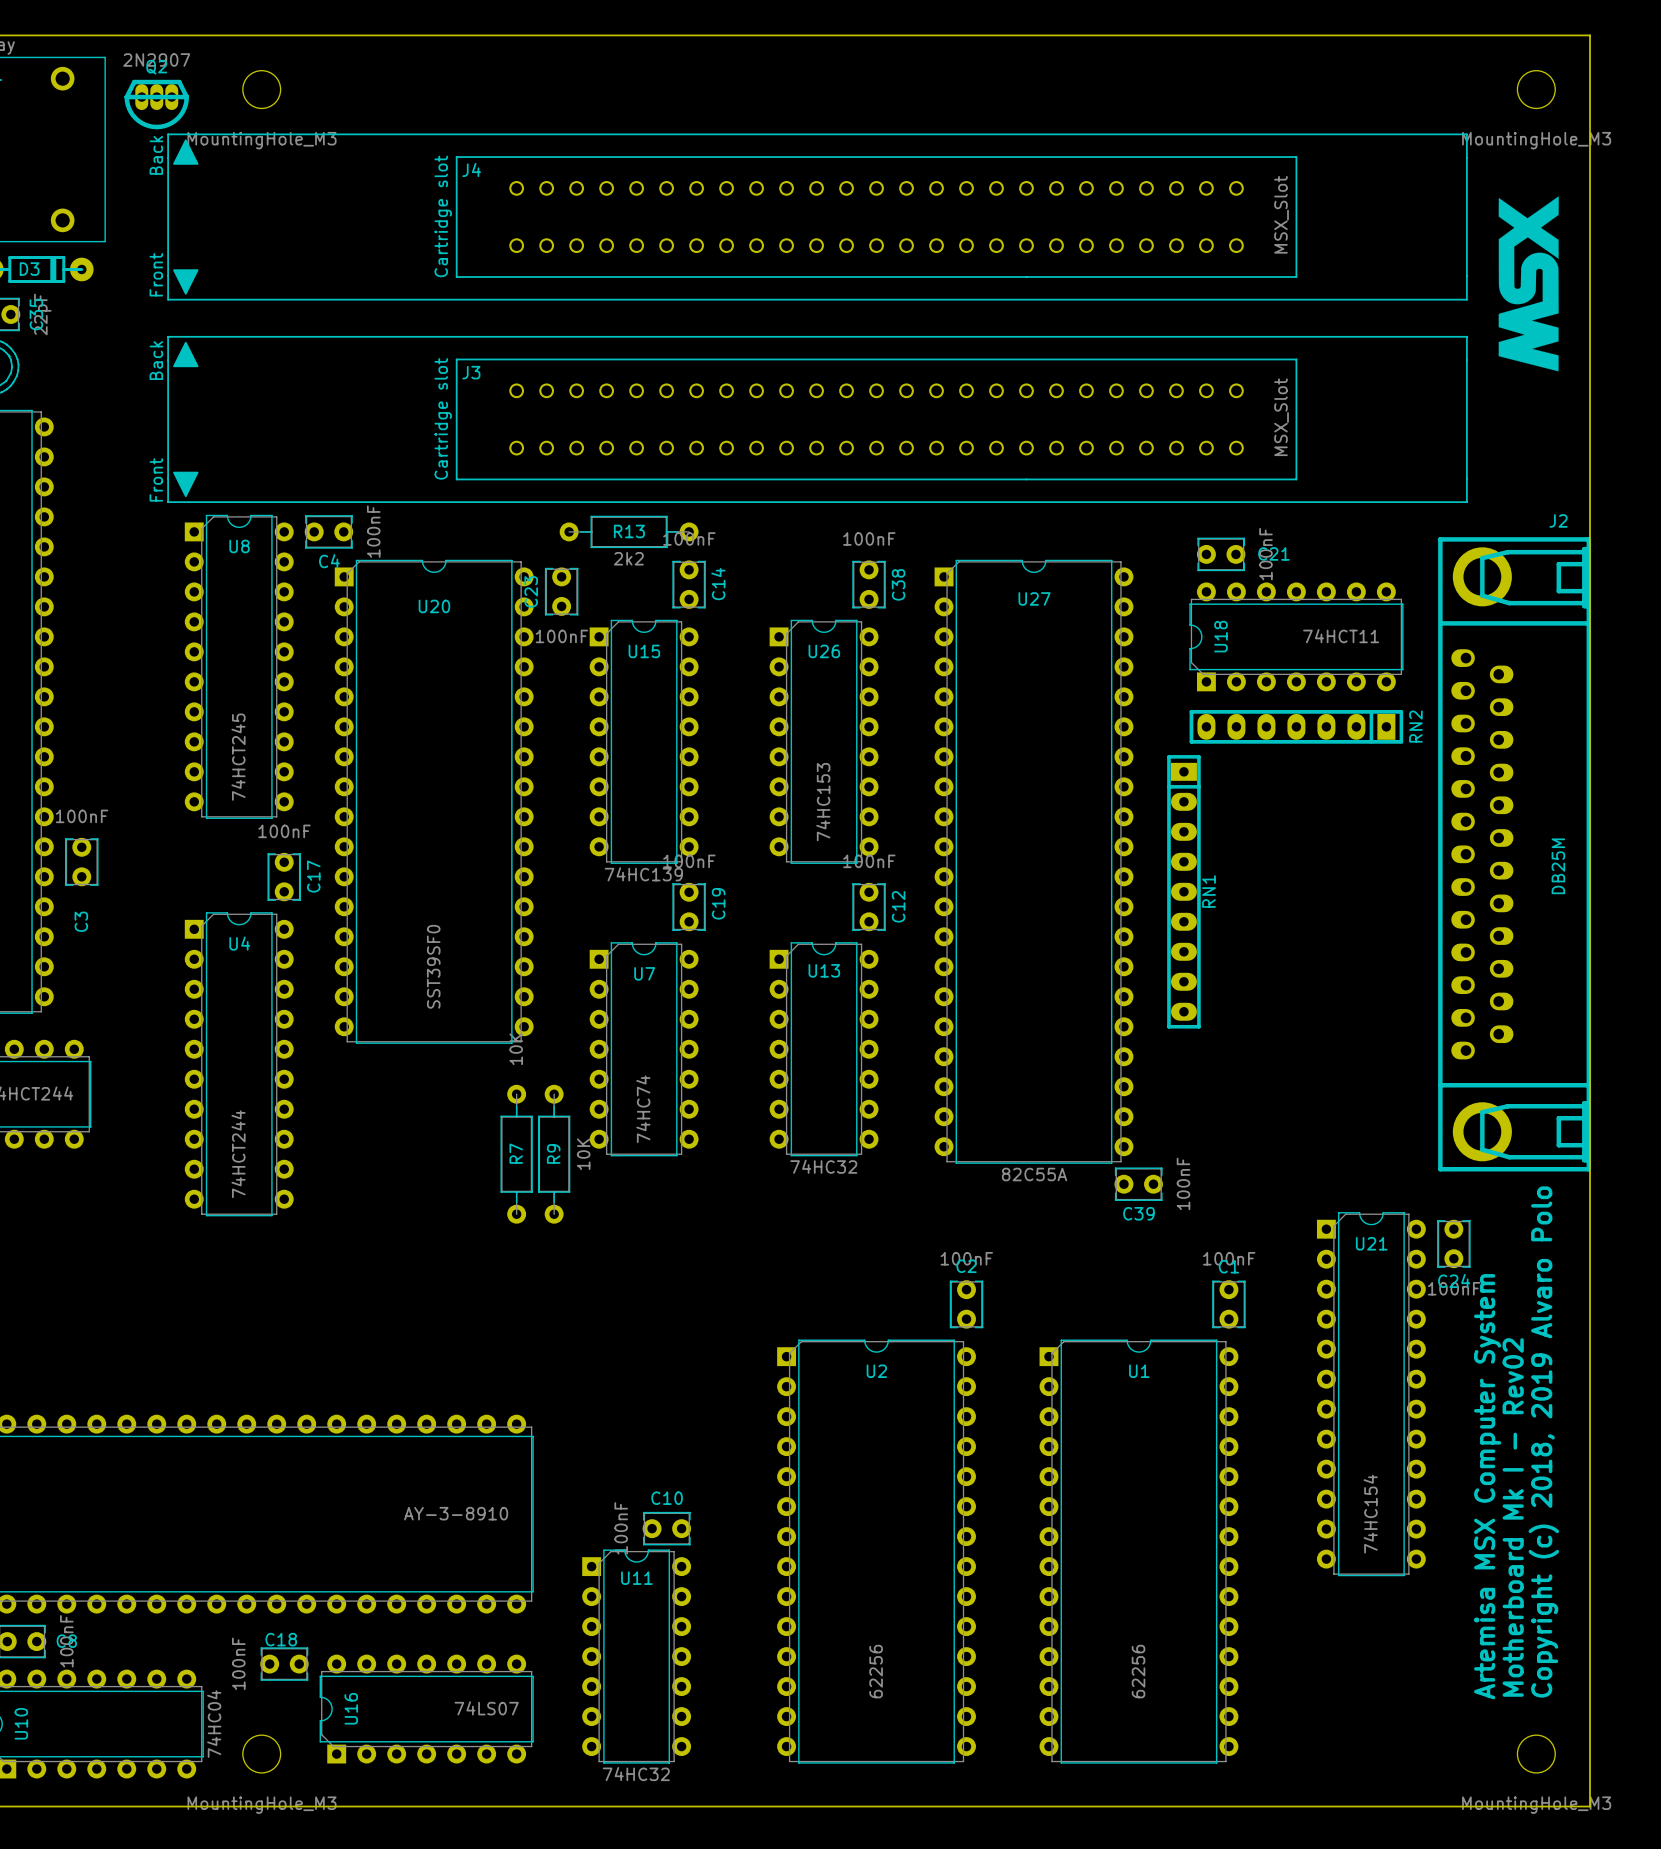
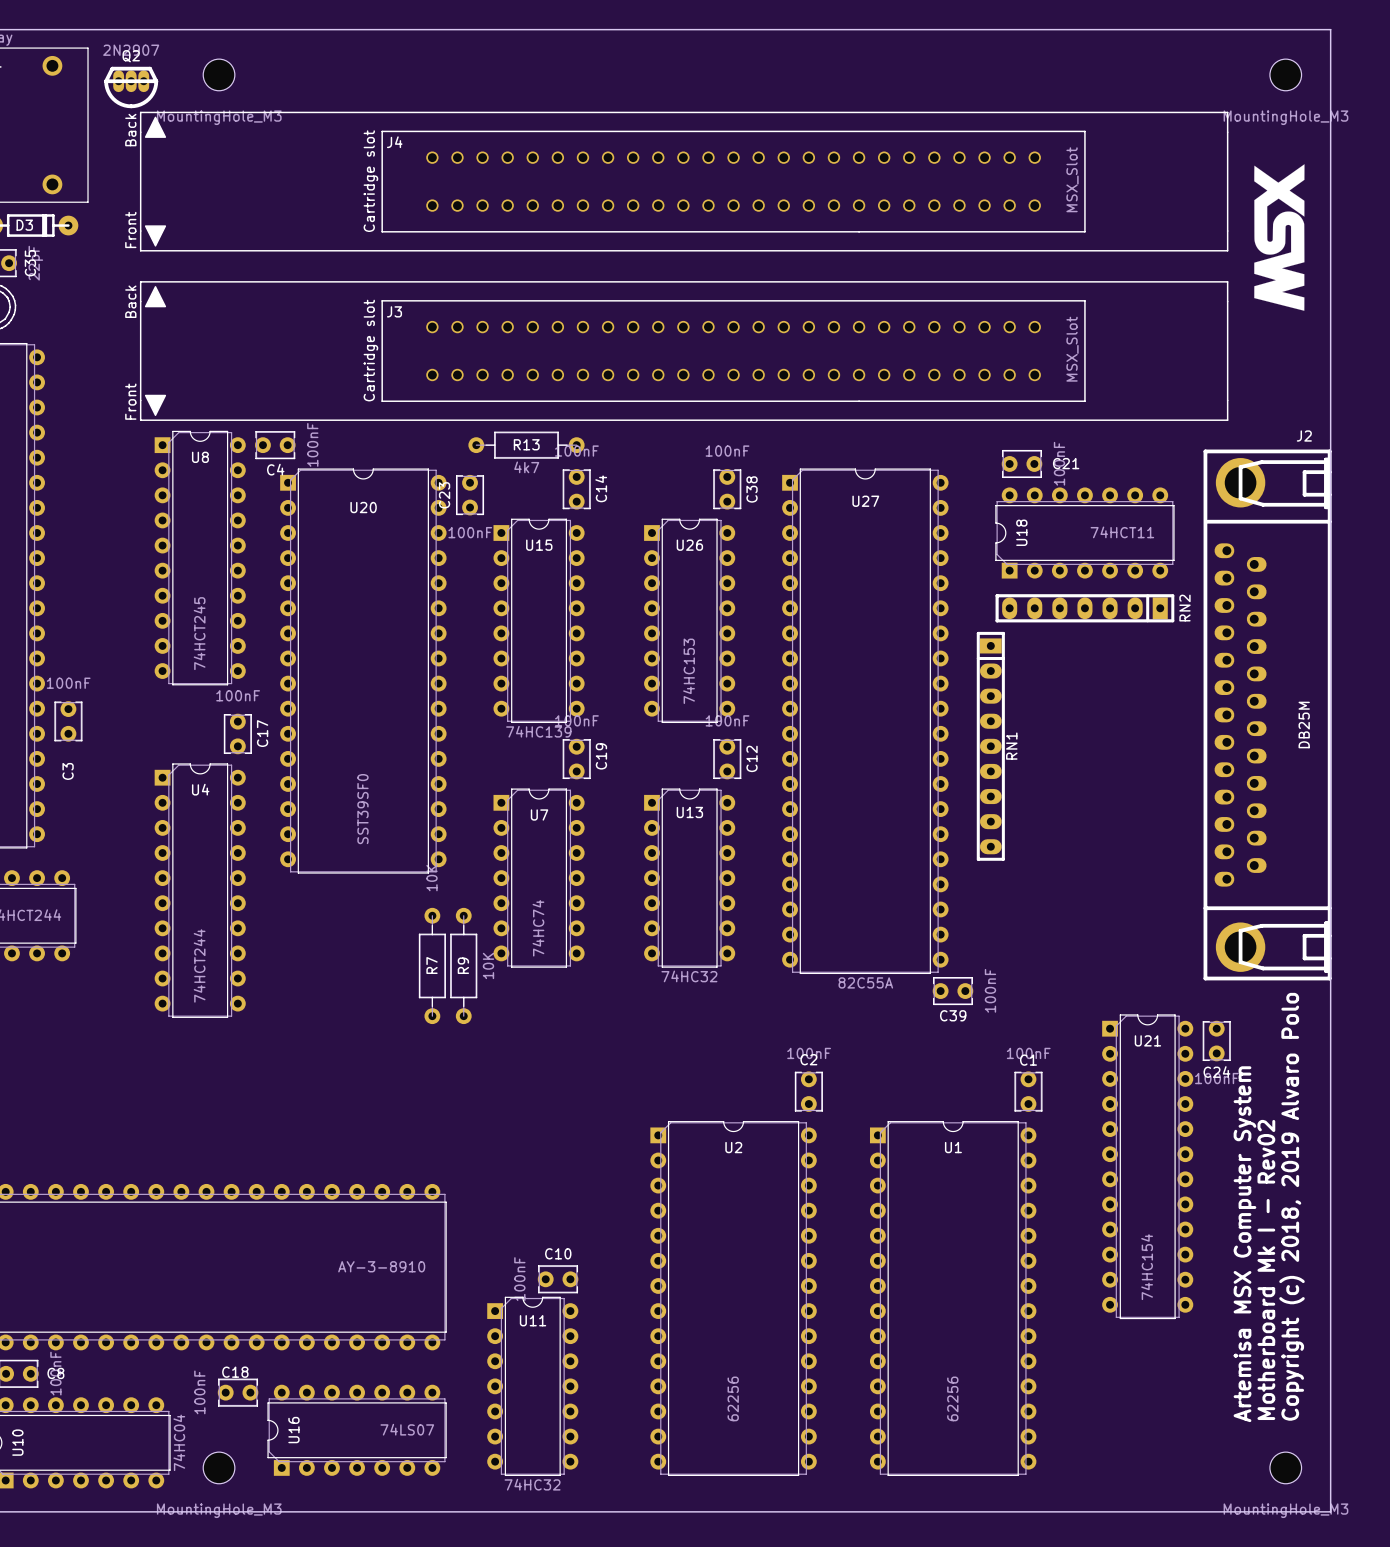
R13 value: 2k2 (628, 558) -> 4k7 (526, 467)

